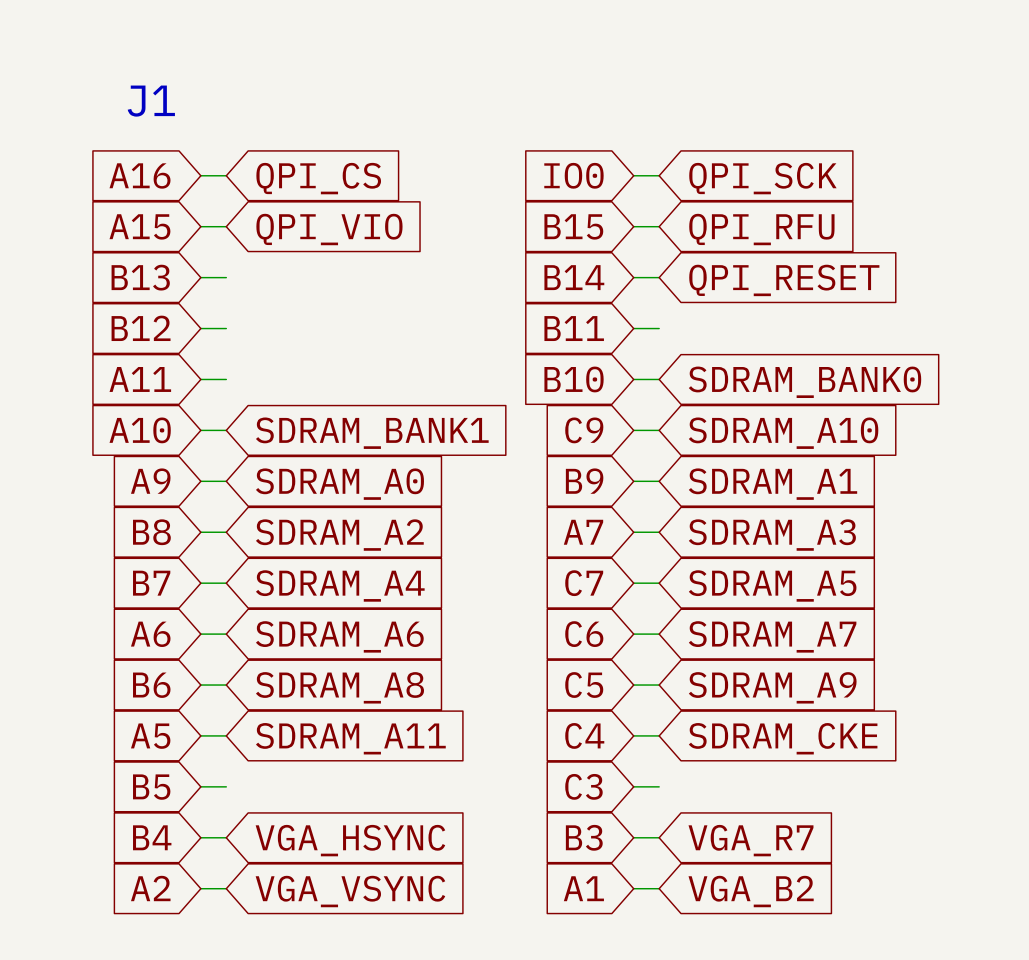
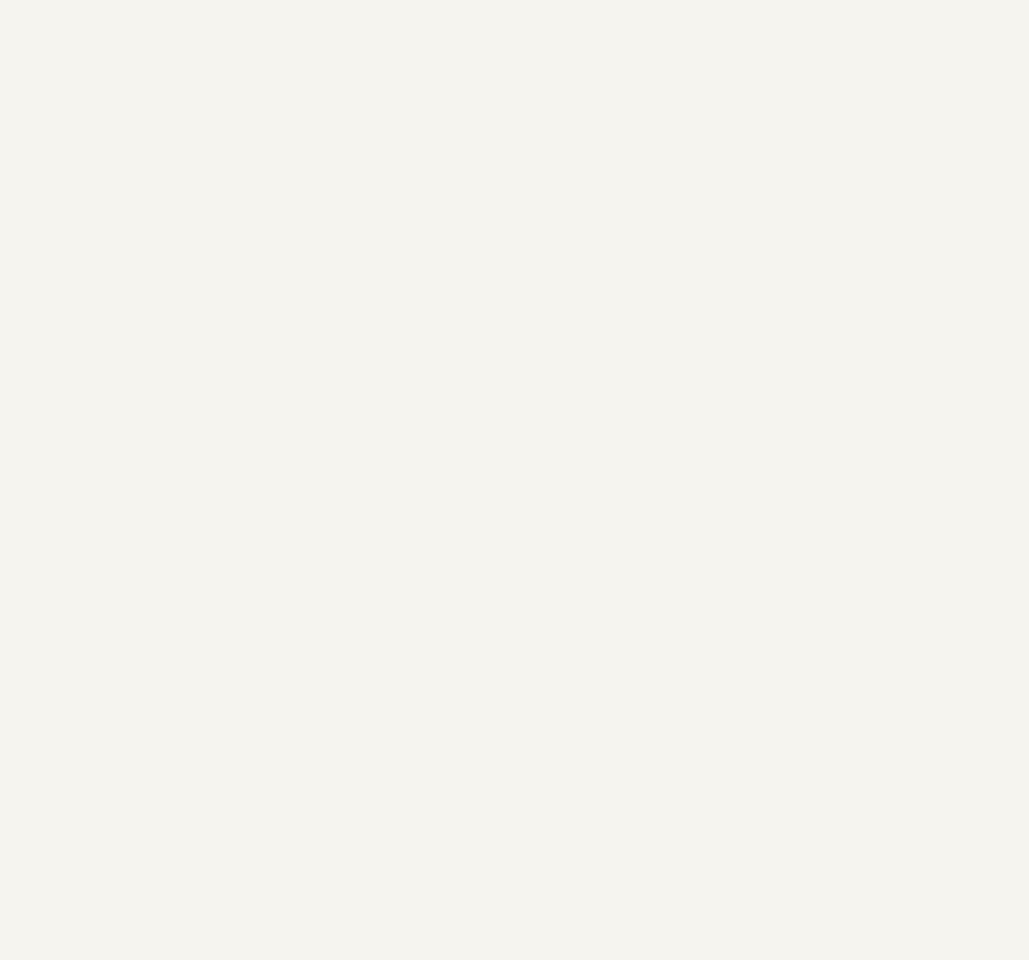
text: J1 (151, 101) -> none
global label: A16 (140, 175) -> none
wire: (200, 175) (226, 175) -> none
global label: IO0 (573, 175) -> none
wire: (633, 175) (659, 175) -> none
global label: QPI_CS (318, 178) -> none
global label: QPI_SCK (762, 178) -> none
global label: A15 (139, 226) -> none
wire: (200, 226) (226, 226) -> none
global label: B15 (573, 226) -> none
wire: (633, 226) (659, 226) -> none
global label: QPI_VIO (329, 229) -> none
global label: QPI_RFU (761, 229) -> none
global label: B13 (140, 277) -> none
wire: (200, 277) (226, 277) -> none
global label: B14 (574, 277) -> none
wire: (633, 277) (659, 277) -> none
global label: QPI_RESET (784, 280) -> none
global label: B12 (141, 328) -> none
wire: (200, 328) (226, 328) -> none
global label: B11 (574, 328) -> none
wire: (633, 328) (659, 328) -> none
global label: A11 (140, 379) -> none
wire: (200, 379) (226, 379) -> none
global label: B10 (574, 379) -> none
wire: (633, 379) (659, 379) -> none
global label: SDRAM_BANK0 (805, 382) -> none
global label: A10 (140, 430) -> none
wire: (200, 430) (226, 430) -> none
global label: C9 (584, 430) -> none
wire: (633, 430) (659, 430) -> none
global label: SDRAM_BANK1 (372, 433) -> none
global label: SDRAM_A10 (783, 433) -> none
global label: A9 (150, 481) -> none
wire: (200, 481) (226, 481) -> none
global label: B9 (584, 481) -> none
wire: (633, 481) (659, 481) -> none
global label: SDRAM_A0 (339, 484) -> none
global label: SDRAM_A1 (773, 484) -> none
global label: B8 (151, 532) -> none
wire: (200, 532) (226, 532) -> none
global label: A7 (583, 532) -> none
wire: (633, 532) (659, 532) -> none
global label: SDRAM_A2 (339, 535) -> none
global label: SDRAM_A3 (772, 535) -> none
global label: B7 (151, 583) -> none
wire: (200, 583) (226, 583) -> none
global label: C7 (584, 583) -> none
wire: (633, 583) (659, 583) -> none
global label: SDRAM_A4 (340, 585) -> none
global label: SDRAM_A5 (772, 585) -> none
global label: A6 (150, 634) -> none
wire: (200, 634) (226, 634) -> none
global label: C6 (584, 634) -> none
wire: (633, 634) (659, 634) -> none
global label: SDRAM_A6 (339, 636) -> none
global label: SDRAM_A7 (772, 636) -> none
global label: B6 (151, 685) -> none
wire: (200, 685) (226, 685) -> none
global label: C5 (584, 685) -> none
wire: (633, 685) (659, 685) -> none
global label: SDRAM_A8 (340, 687) -> none
global label: SDRAM_A9 (772, 687) -> none
wire: (200, 735) (226, 735) -> none
global label: C4 (584, 735) -> none
wire: (633, 735) (659, 735) -> none
global label: A5 (150, 736) -> none
global label: SDRAM_A11 (350, 738) -> none
global label: SDRAM_CKE (783, 738) -> none
wire: (200, 786) (226, 786) -> none
global label: C3 (583, 786) -> none
wire: (633, 786) (659, 786) -> none
global label: B5 (151, 787) -> none
global label: B4 (152, 837) -> none
wire: (200, 837) (226, 837) -> none
global label: B3 (584, 837) -> none
wire: (633, 837) (659, 837) -> none
global label: VGA_HSYNC (350, 840) -> none
global label: VGA_R7 (750, 840) -> none
global label: A2 (150, 888) -> none
wire: (200, 888) (226, 888) -> none
global label: A1 (583, 888) -> none
wire: (633, 888) (659, 888) -> none
global label: VGA_VSYNC (350, 891) -> none
global label: VGA_B2 (751, 891) -> none

